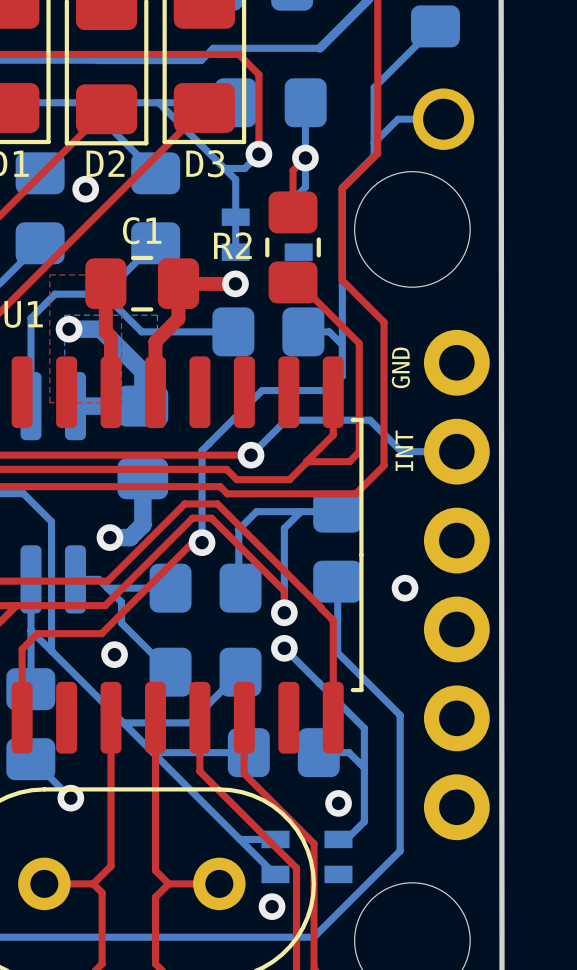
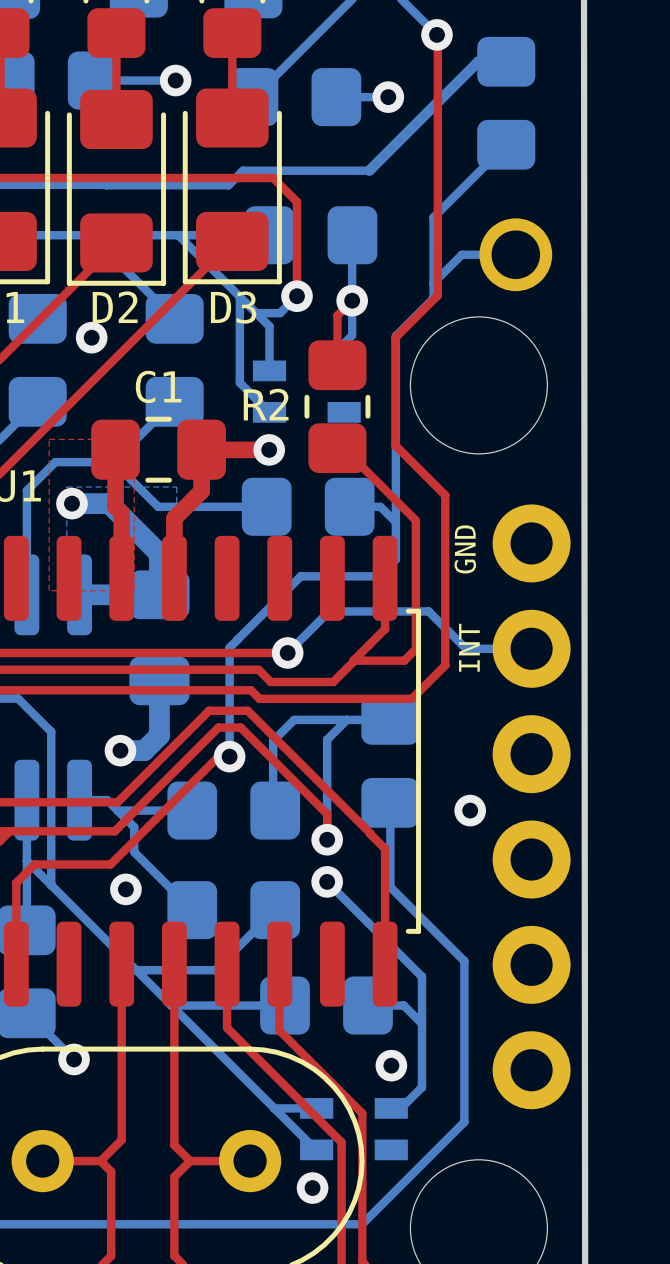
bottom track: (235, 217) (235, 252) -> (239, 296) (239, 382) (269, 412)

